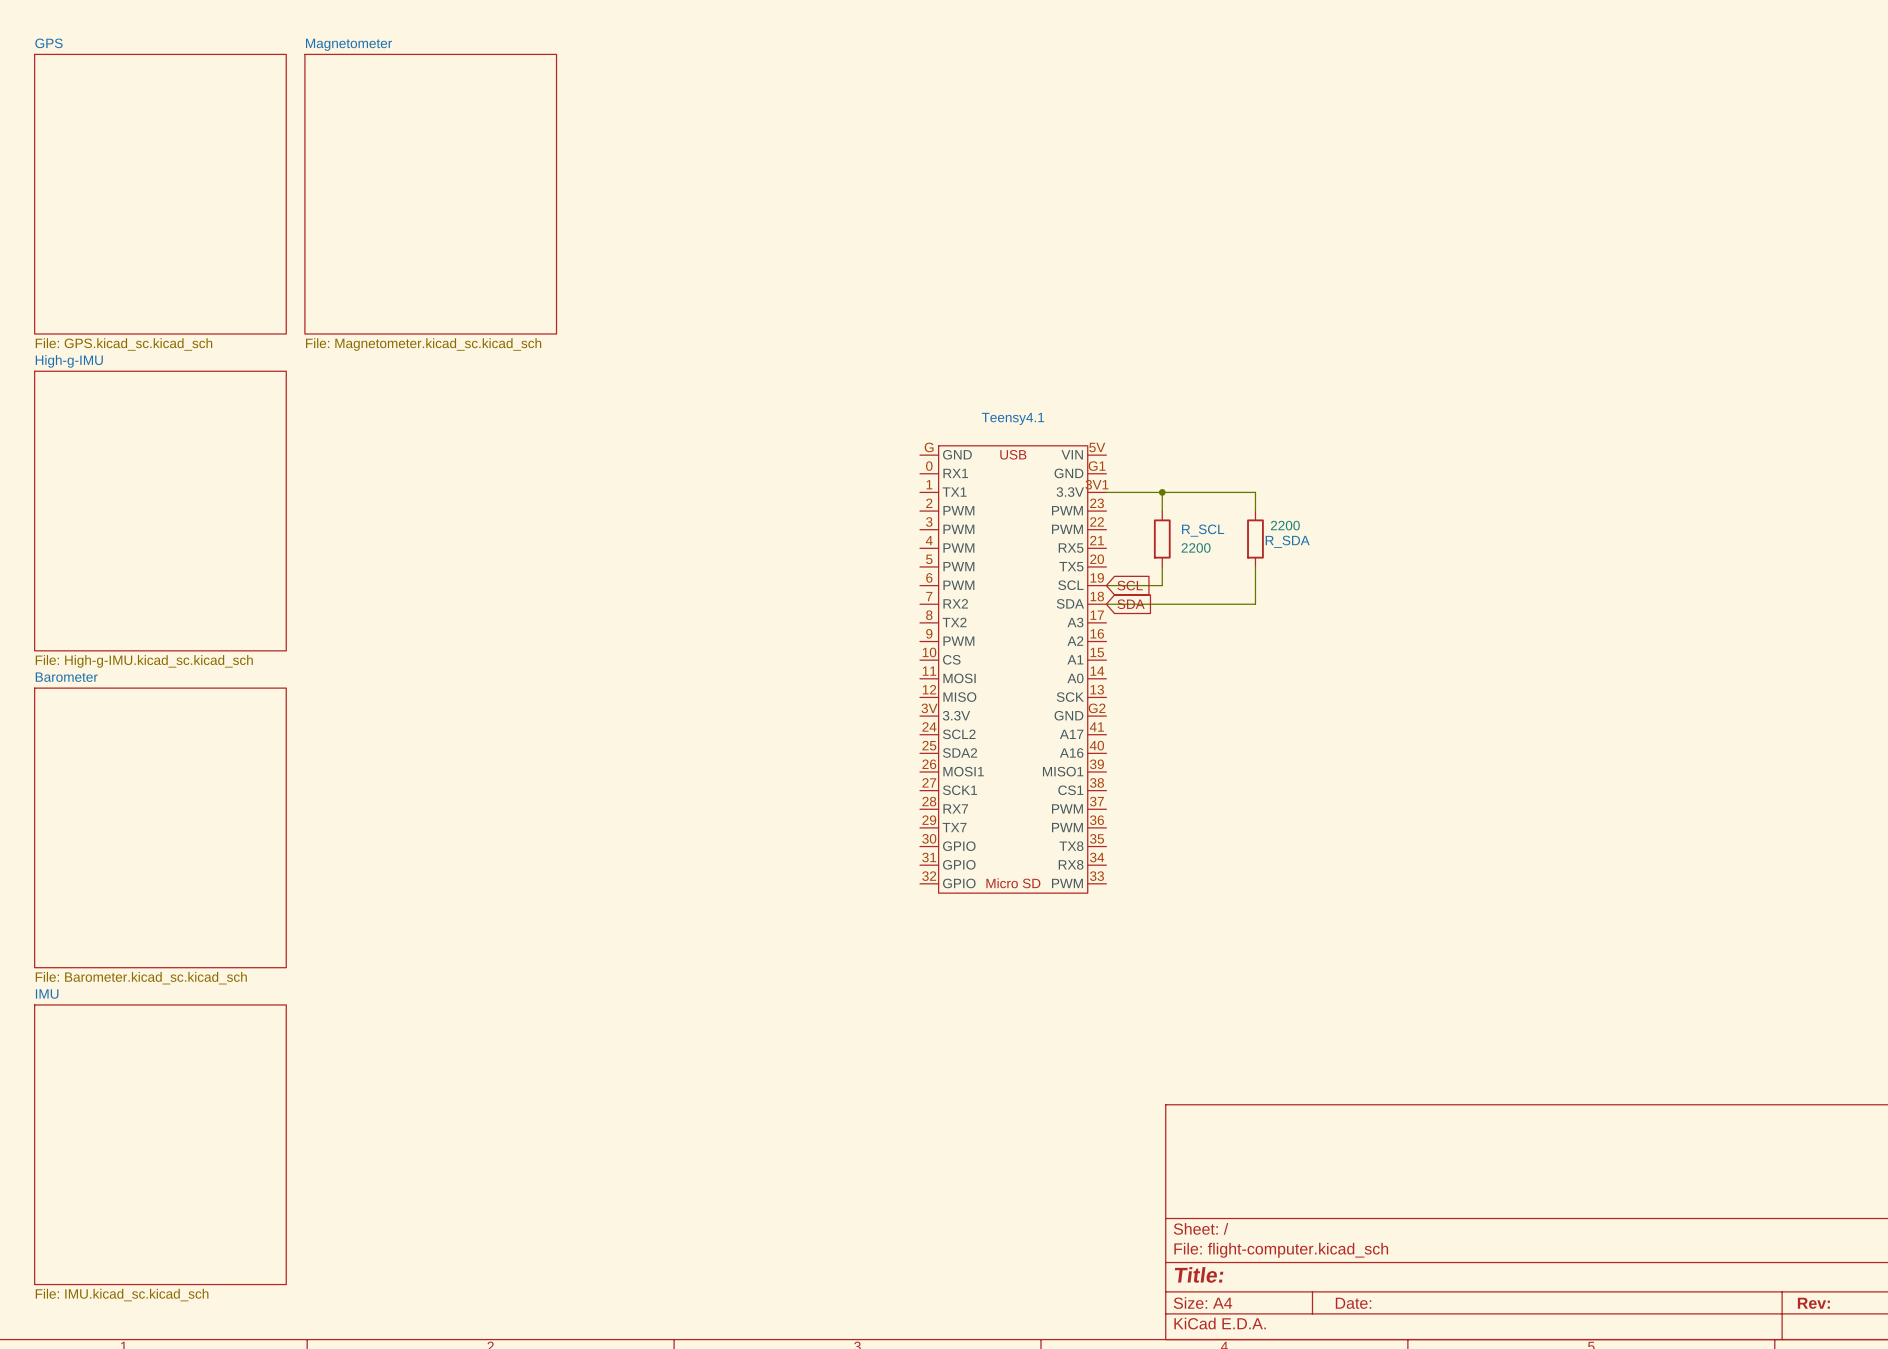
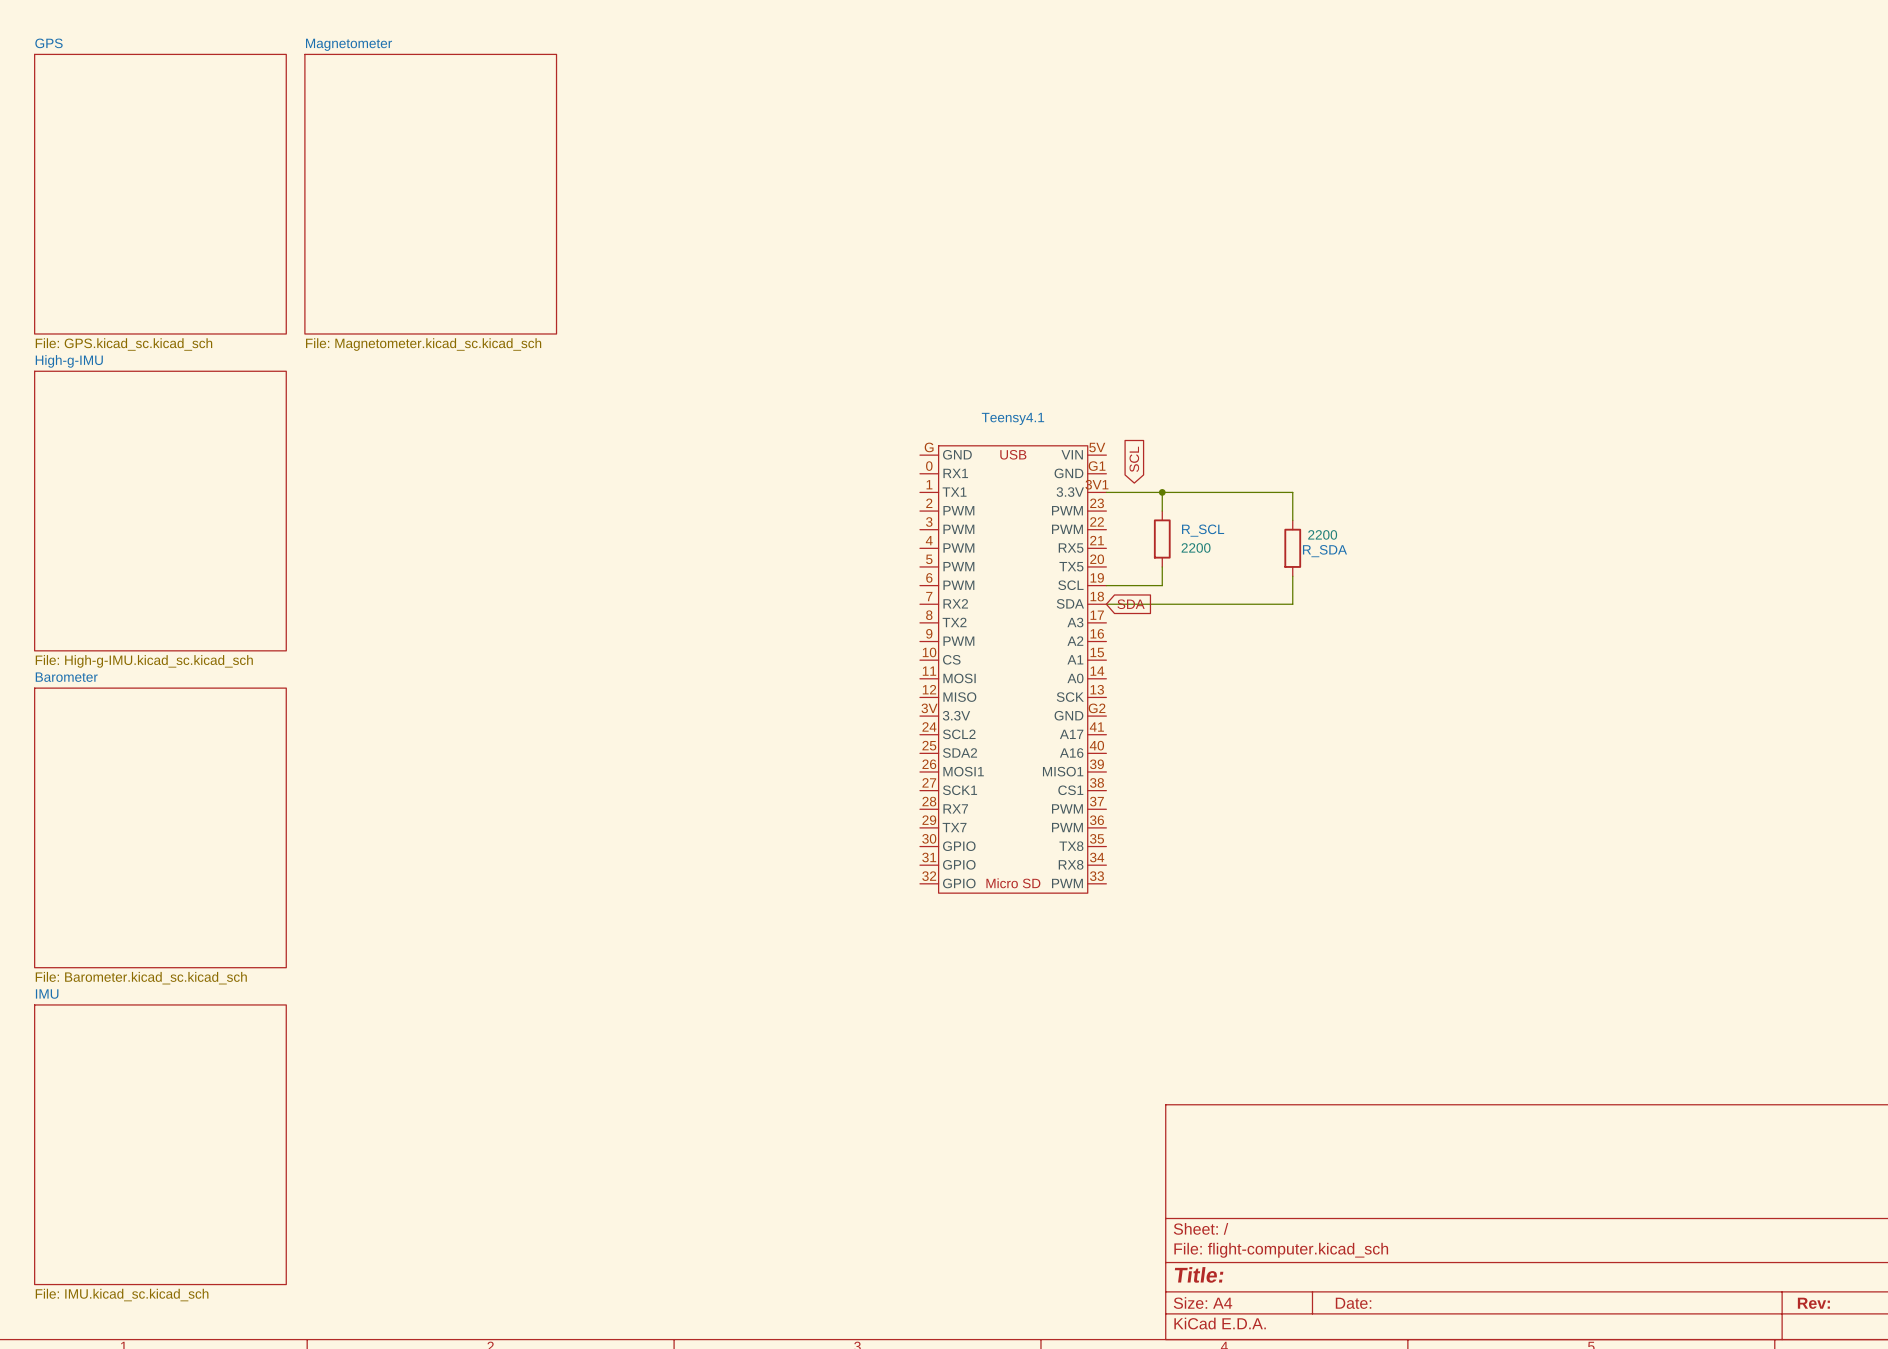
wire: (1255, 492) (1255, 511) -> (1255, 492) (1292, 492) (1292, 520)
R_SDA position: (1255, 539) -> (1292, 548)
wire: (1255, 566) (1255, 604) -> (1292, 576) (1292, 604) (1255, 604)
global label rotation: 0° (1130, 585) -> 90° counterclockwise (1134, 459)
global label position: SCL (1130, 585) -> SCL (1134, 459)

